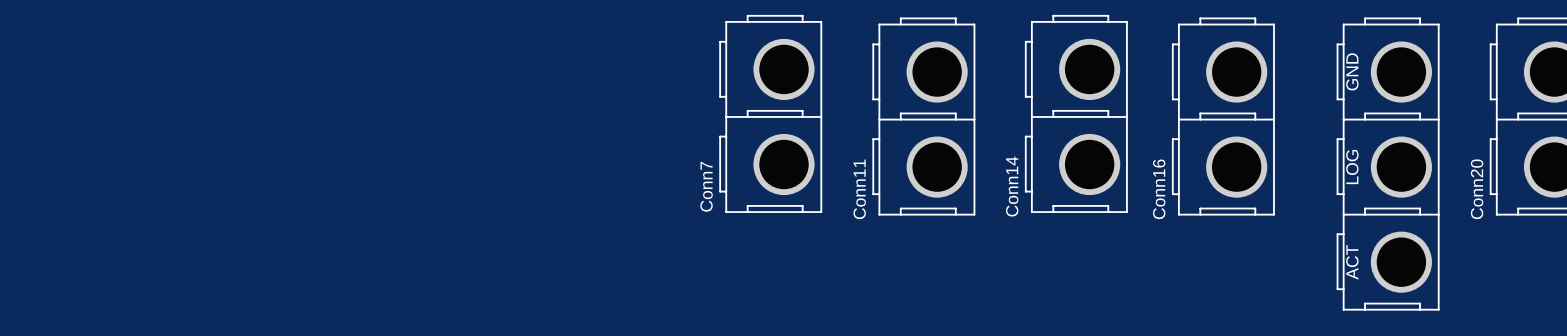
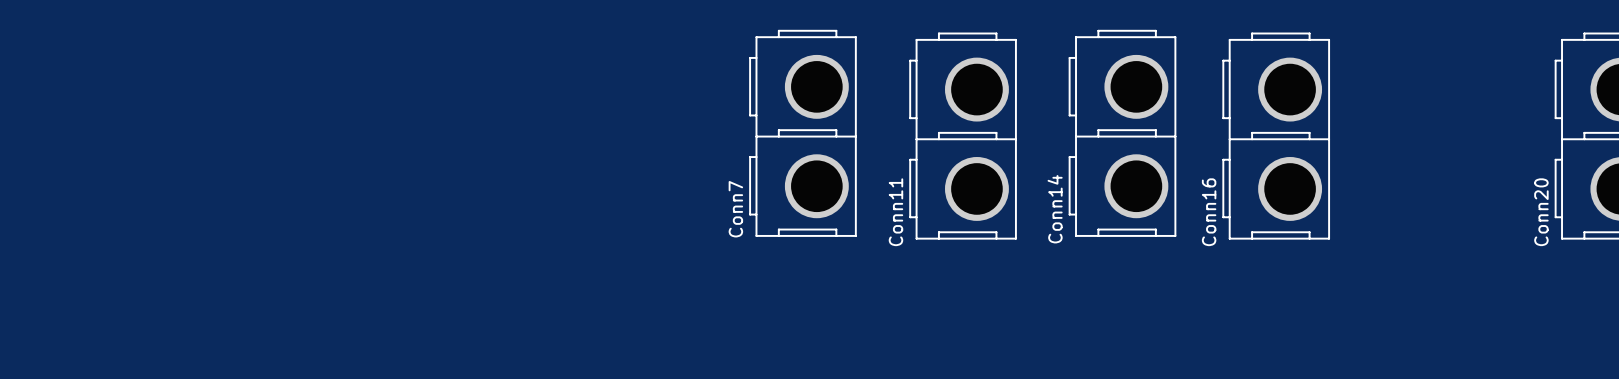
part: (1388, 164) -> none

